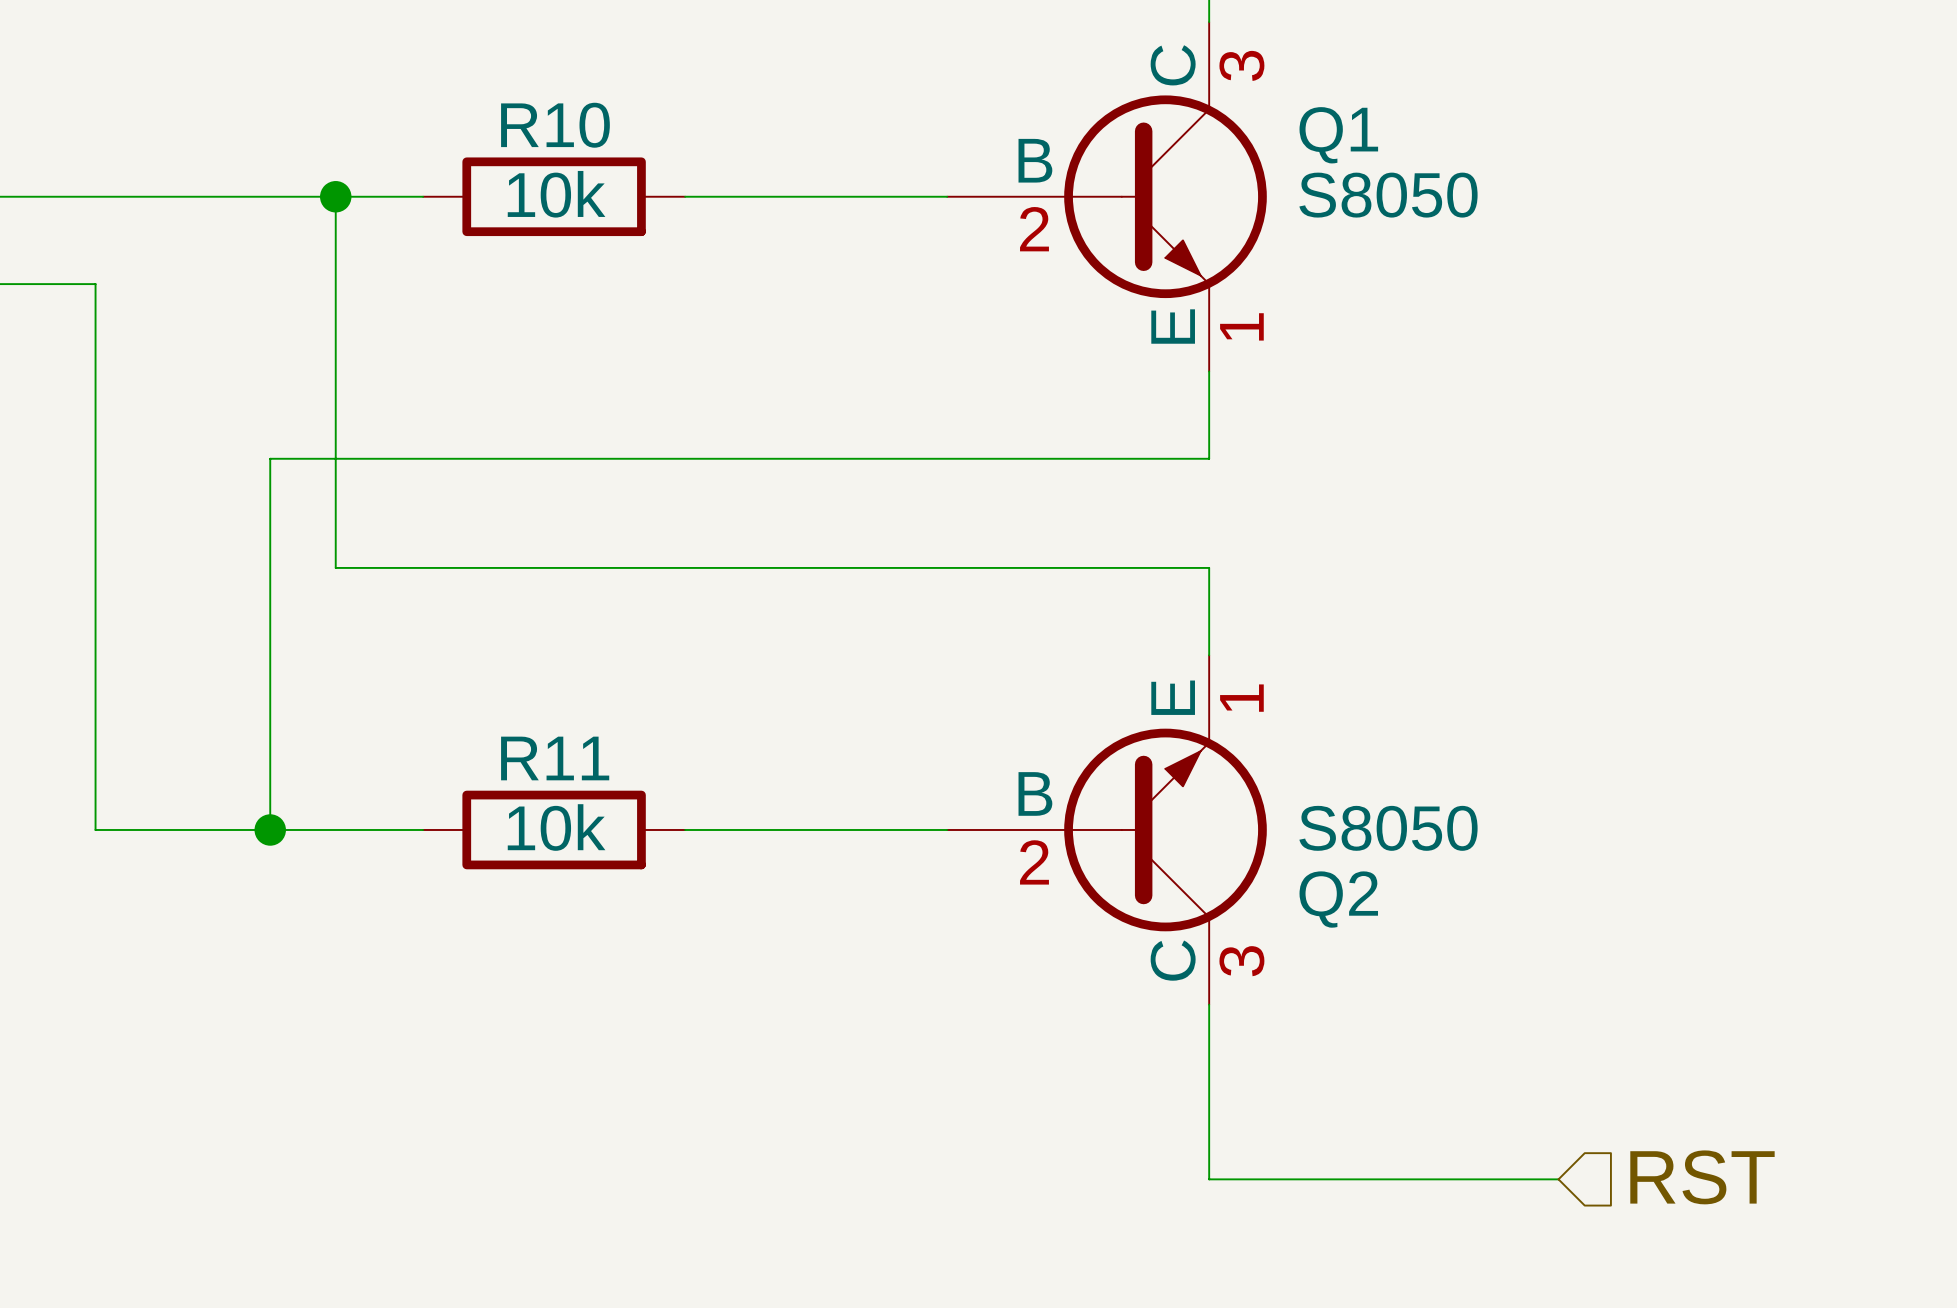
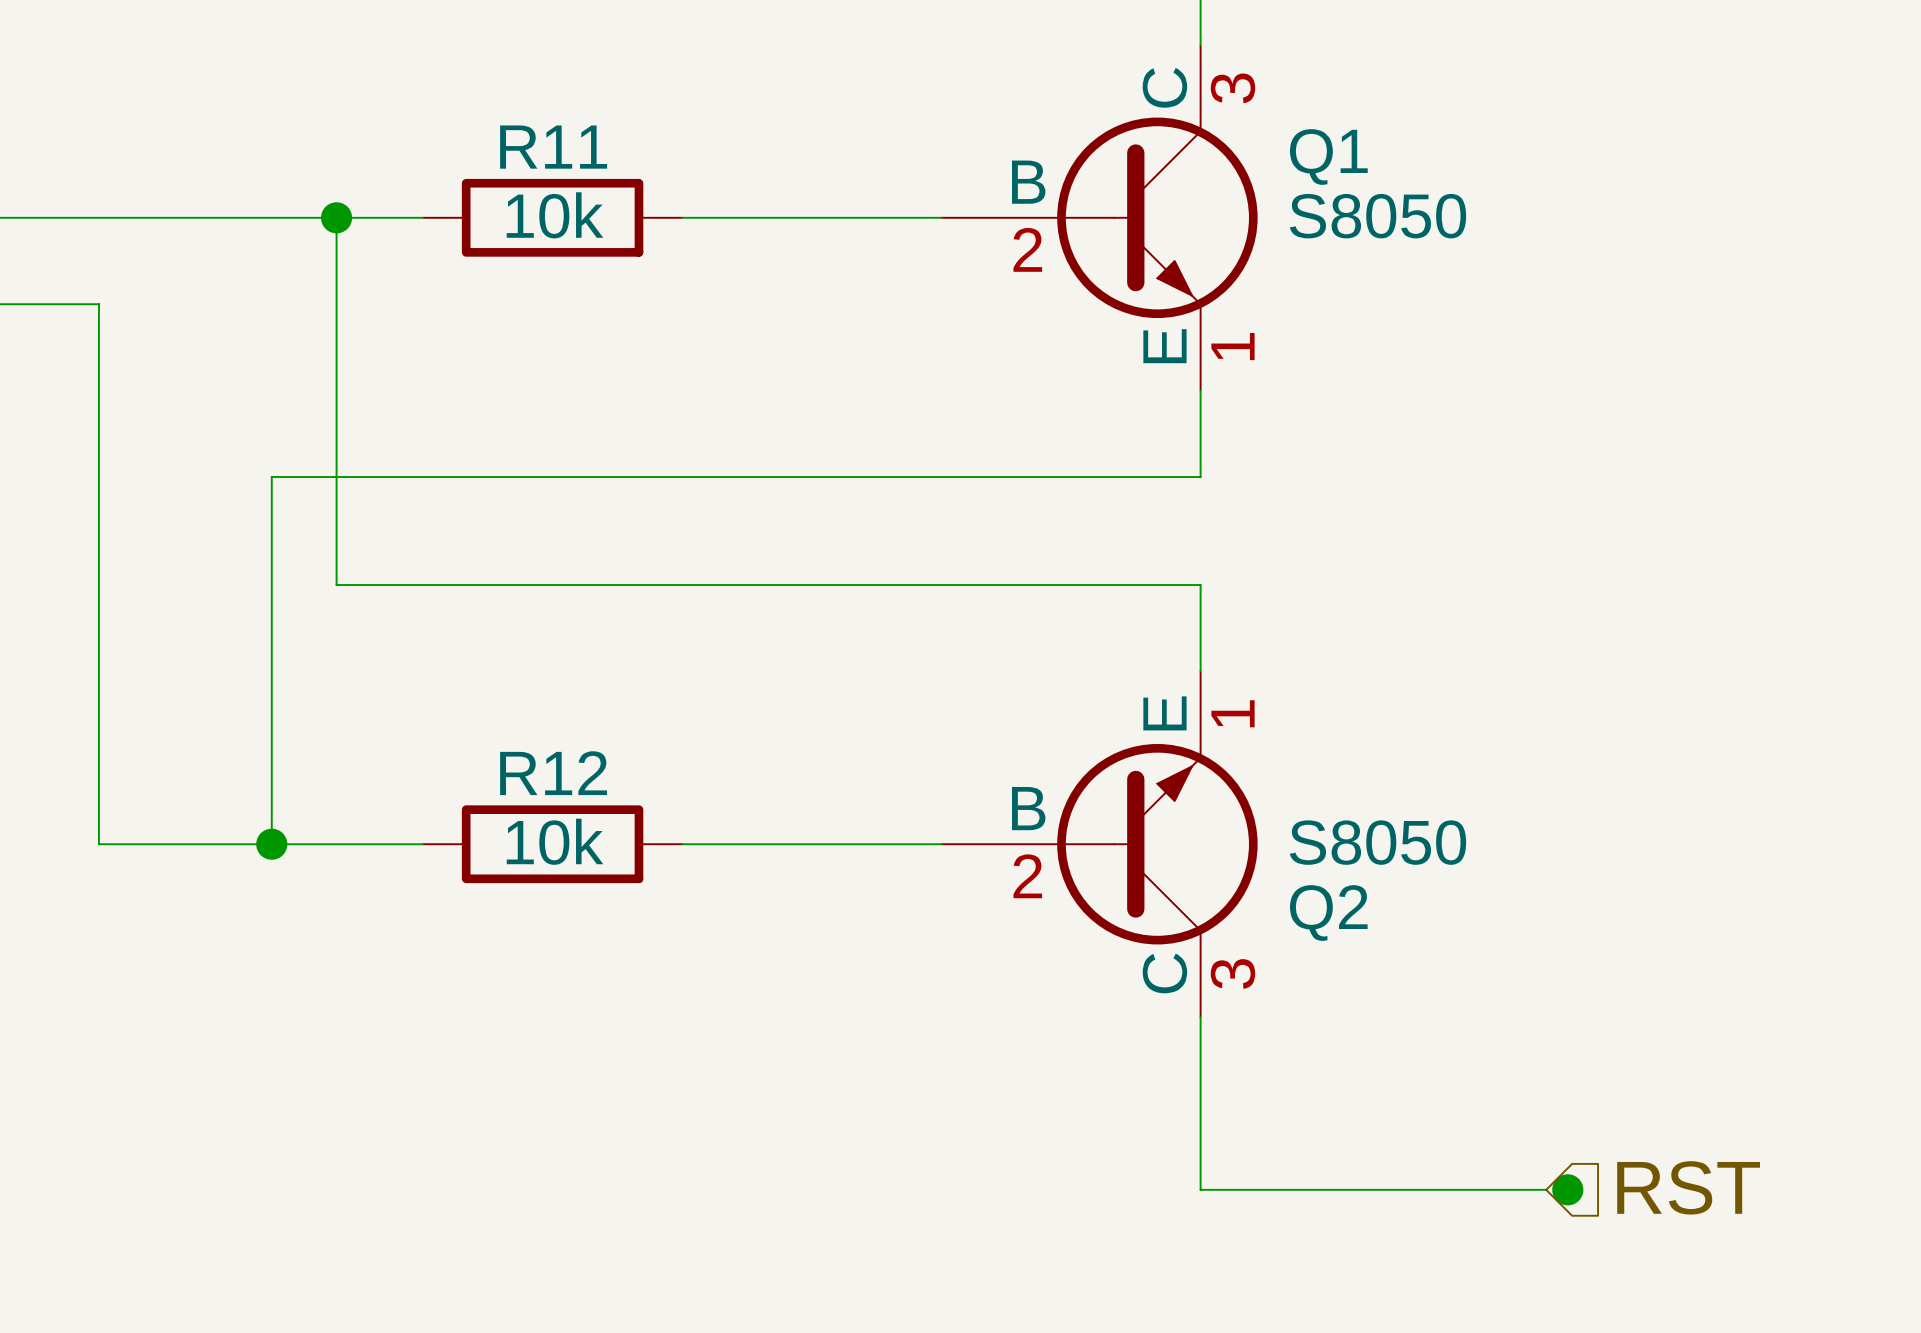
R10 name: R10 (555, 125) -> R11 (553, 147)
R11 name: R11 (555, 758) -> R12 (553, 773)
junction: none -> (1567, 1189)

